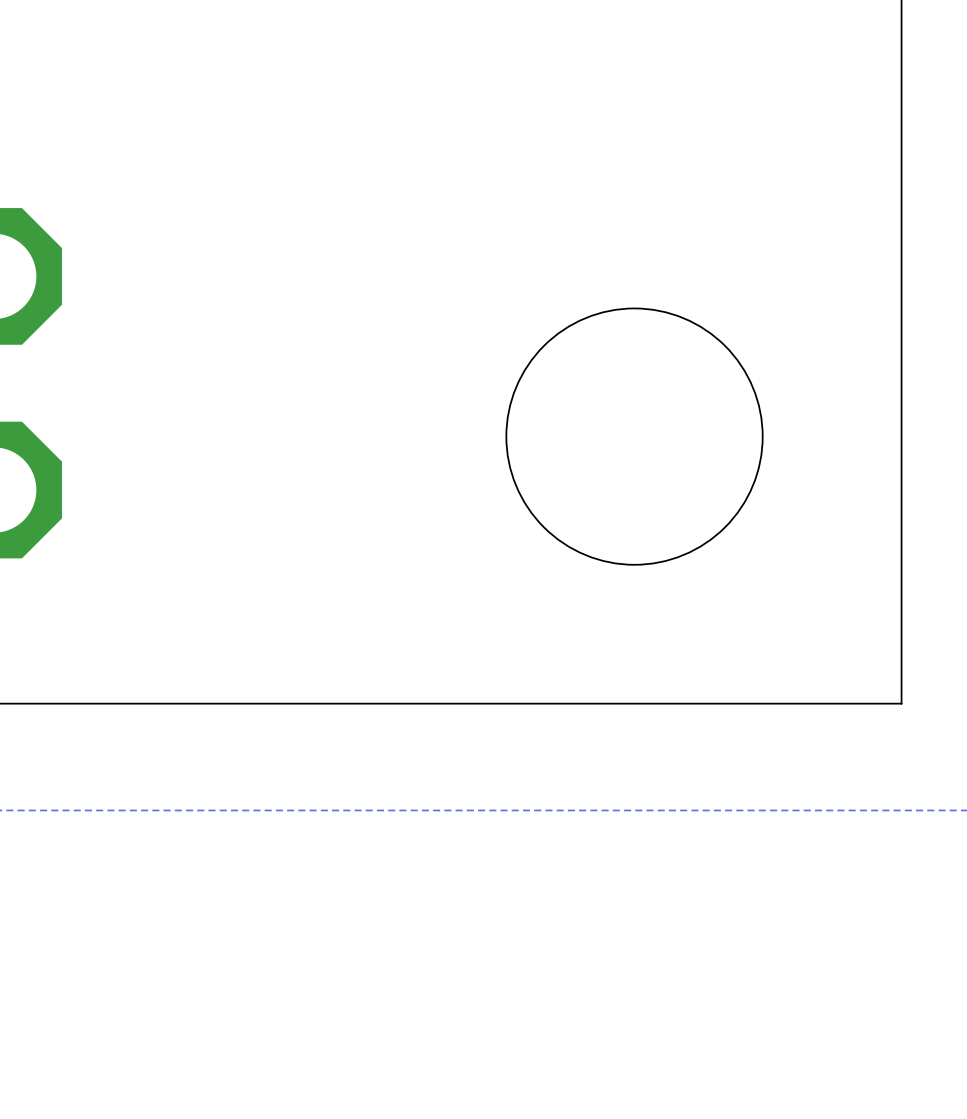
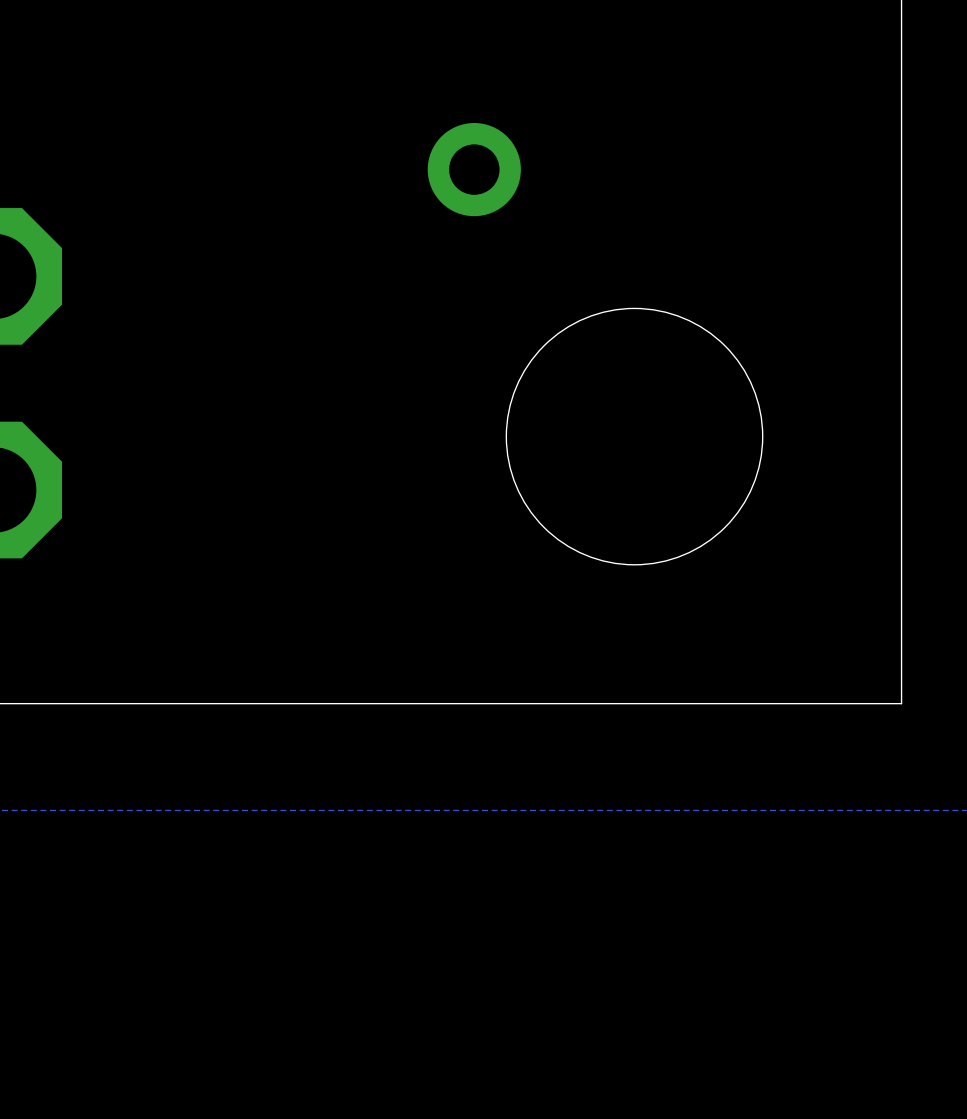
via: none -> (474, 169)

